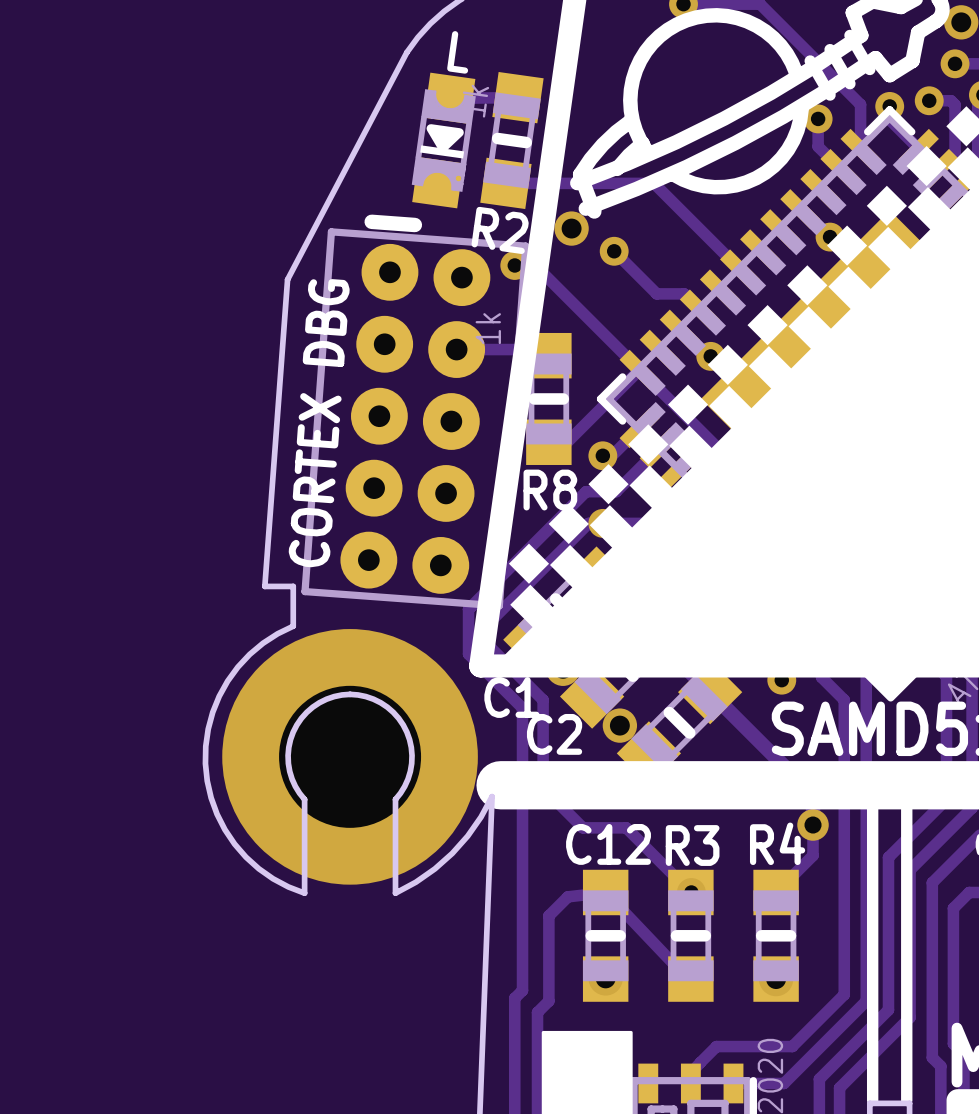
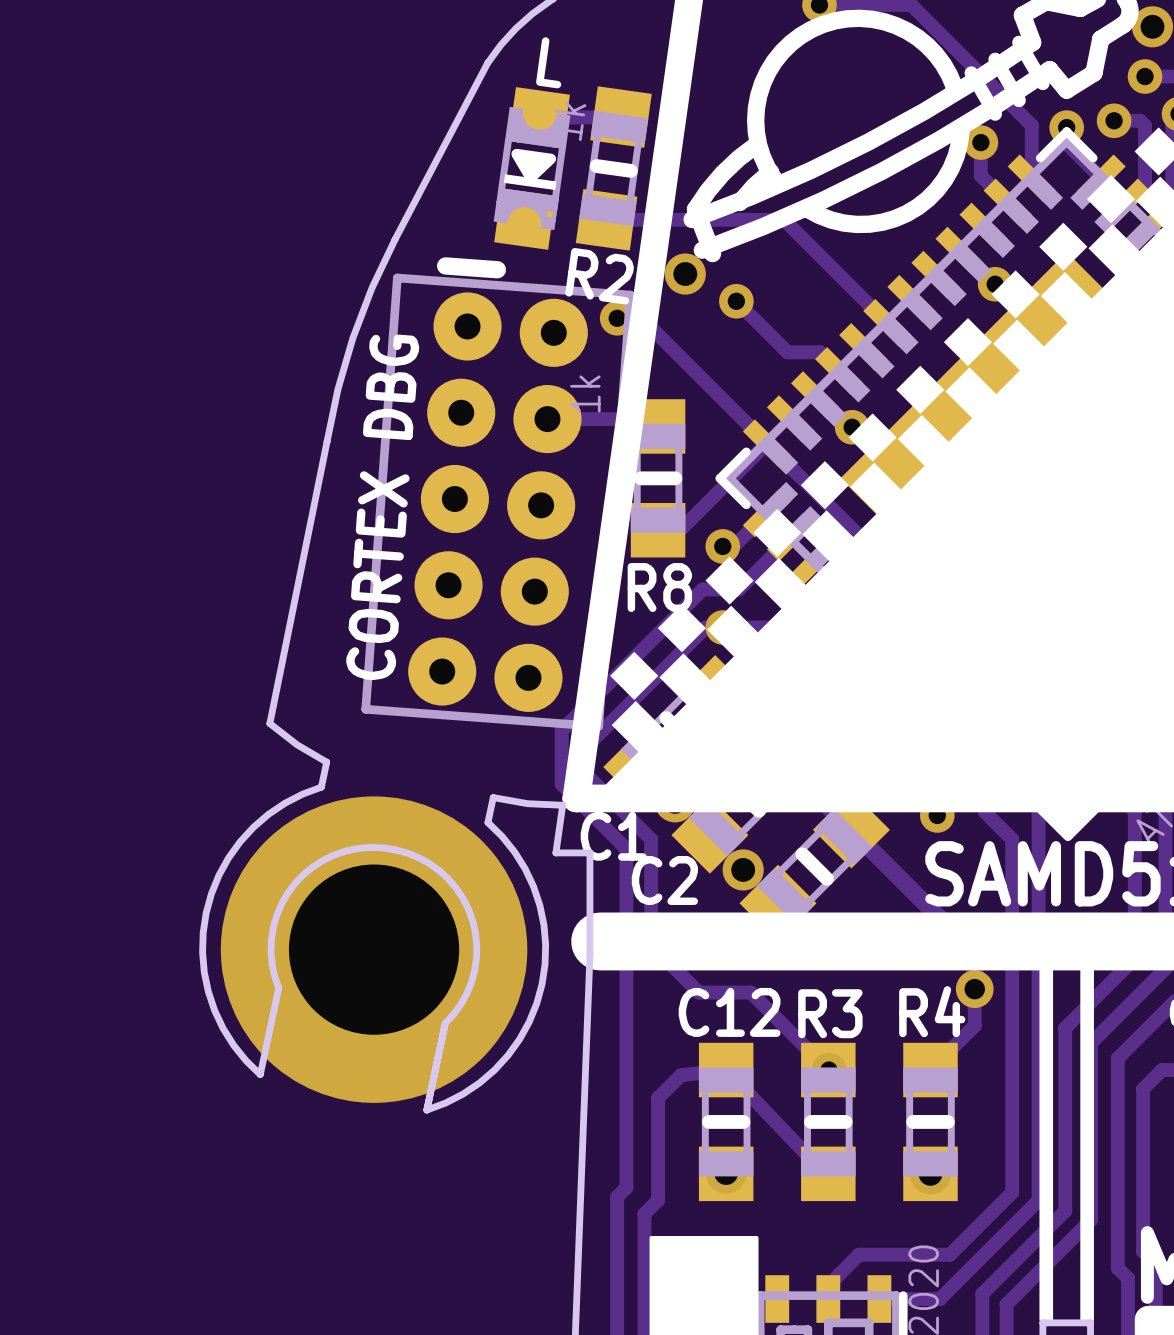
board edge: (329, 200) (287, 279) (264, 586) (293, 586) (293, 626) (263, 643) (249, 654) (227, 681) (219, 696) (212, 712) (205, 746) (205, 763) (211, 797) (224, 829) (245, 857) (273, 878) (304, 893) (304, 799) (295, 786) (289, 771) (288, 755) (290, 739) (301, 718) (312, 707) (334, 696) (350, 694) (365, 696) (387, 707) (398, 718) (409, 739) (412, 755) (410, 771) (404, 786) (395, 799) (395, 893) (434, 868) (452, 853) (467, 836) (492, 796) -> (394, 239) (371, 288) (352, 338) (337, 389) (269, 723) (297, 744) (326, 762) (321, 787) (302, 794) (268, 814) (240, 841) (228, 857) (211, 893) (203, 932) (204, 972) (208, 991) (223, 1028) (246, 1060) (260, 1074) (278, 988) (272, 964) (271, 939) (276, 915) (287, 893) (303, 874) (334, 854) (370, 847) (407, 853) (429, 863) (456, 888) (468, 909) (476, 945) (474, 970) (466, 993) (445, 1023) (426, 1110) (445, 1103) (479, 1082) (494, 1069) (519, 1039) (536, 1003) (545, 964) (543, 925) (539, 905) (525, 868) (502, 836) (487, 822) (493, 797) (527, 803) (562, 805) (555, 852) (589, 852) (589, 955)
via position: (350, 756) -> (374, 949)

